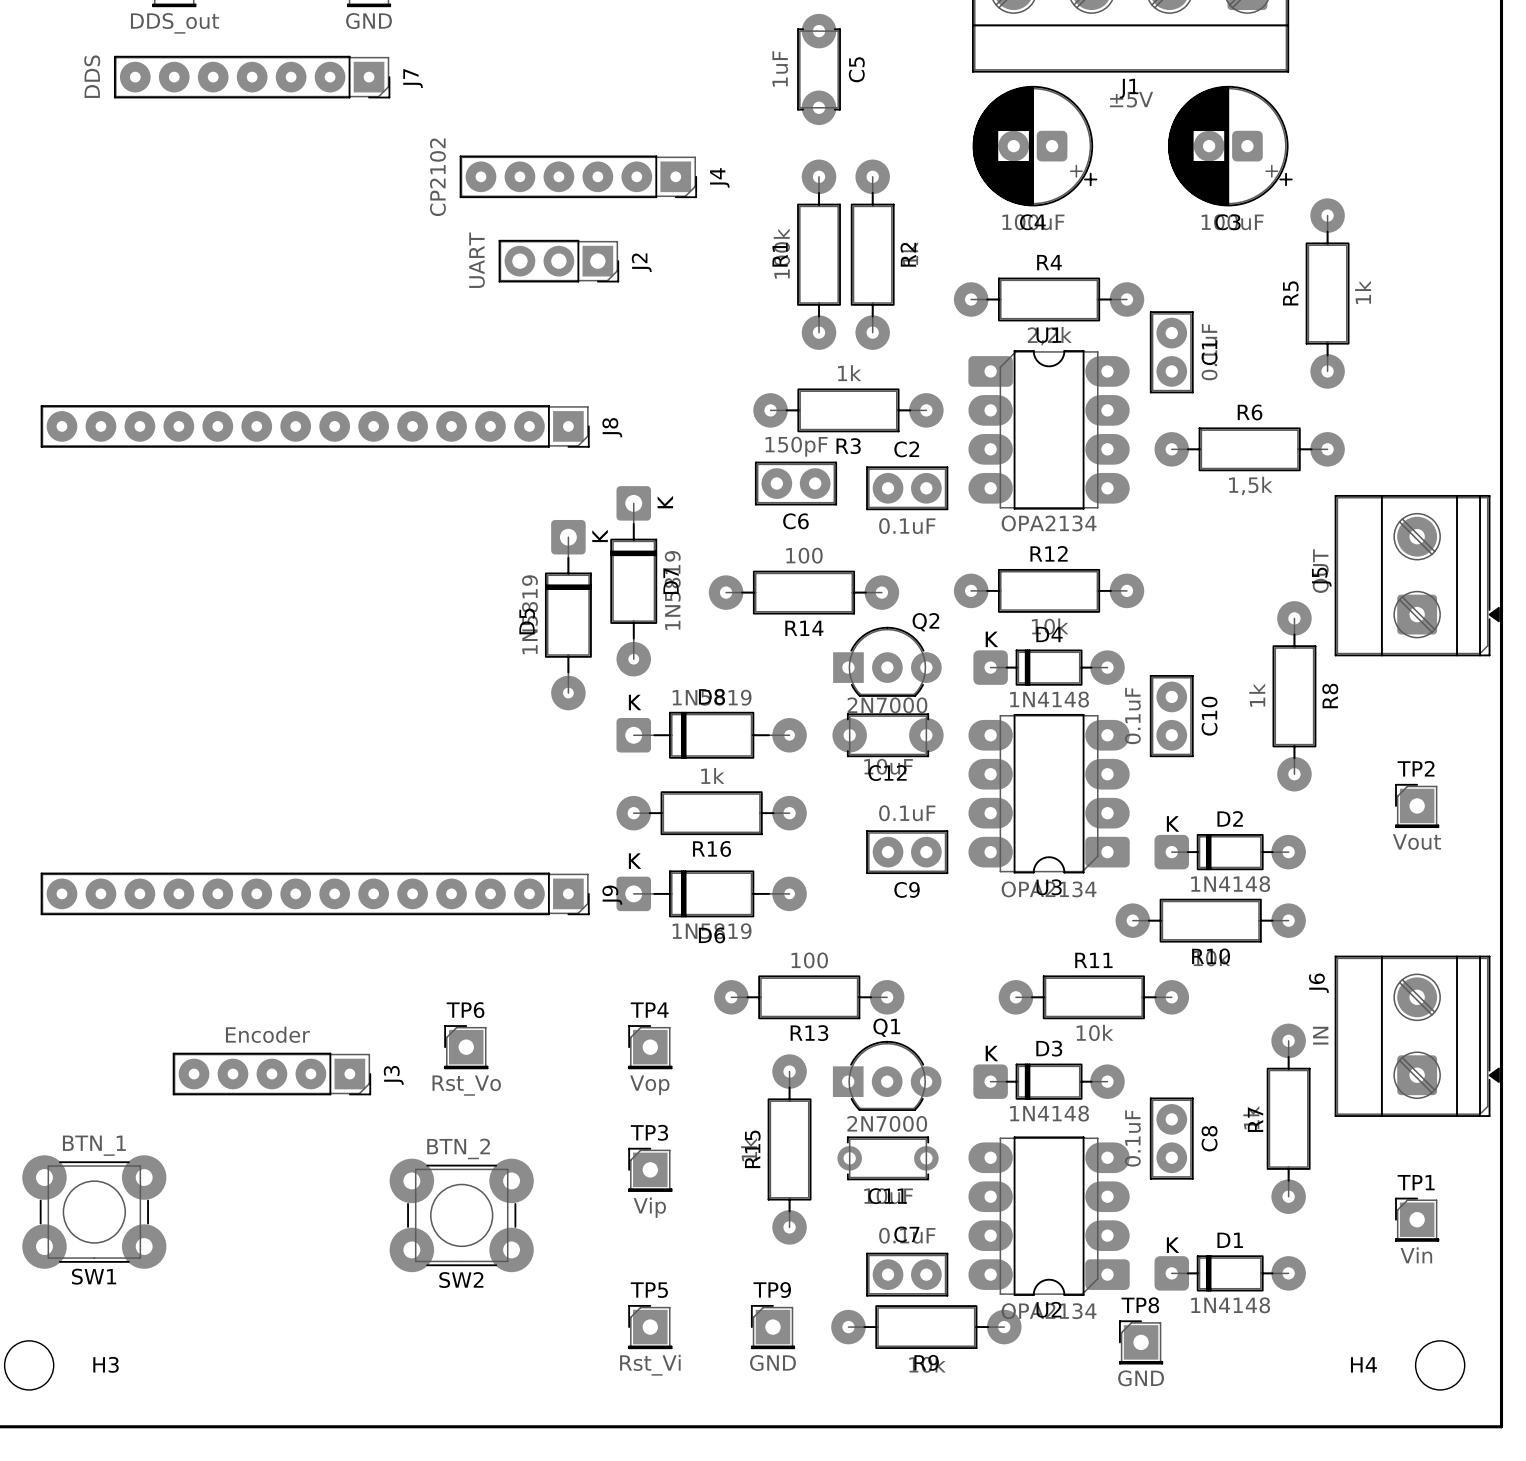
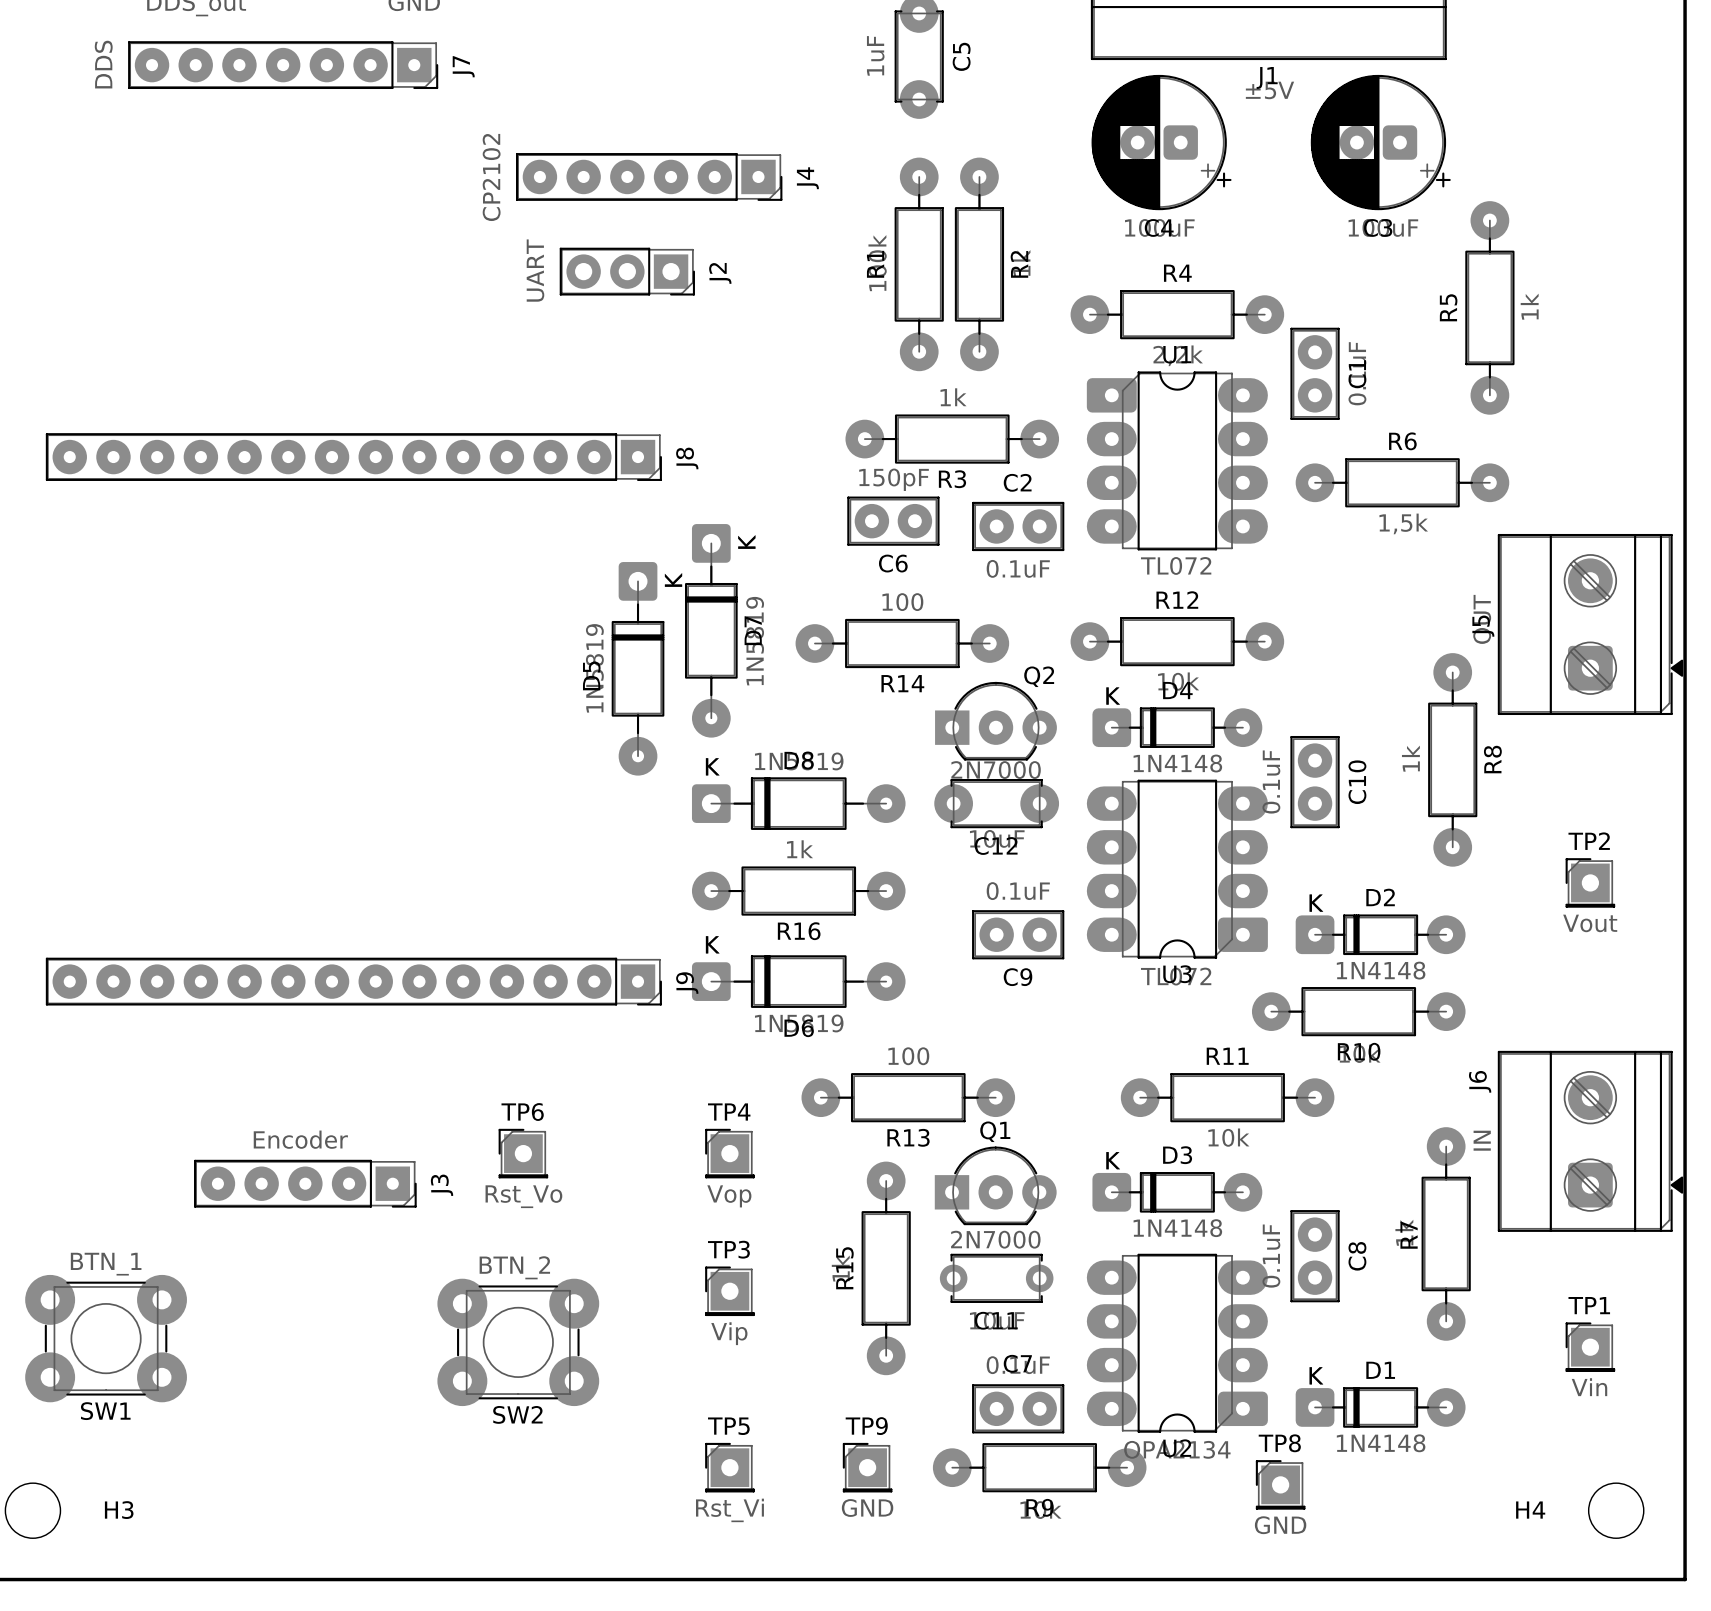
U1 value: OPA2134 (1049, 523) -> TL072 (1176, 565)
U3 value: OPA2134 (1049, 889) -> TL072 (1176, 976)

